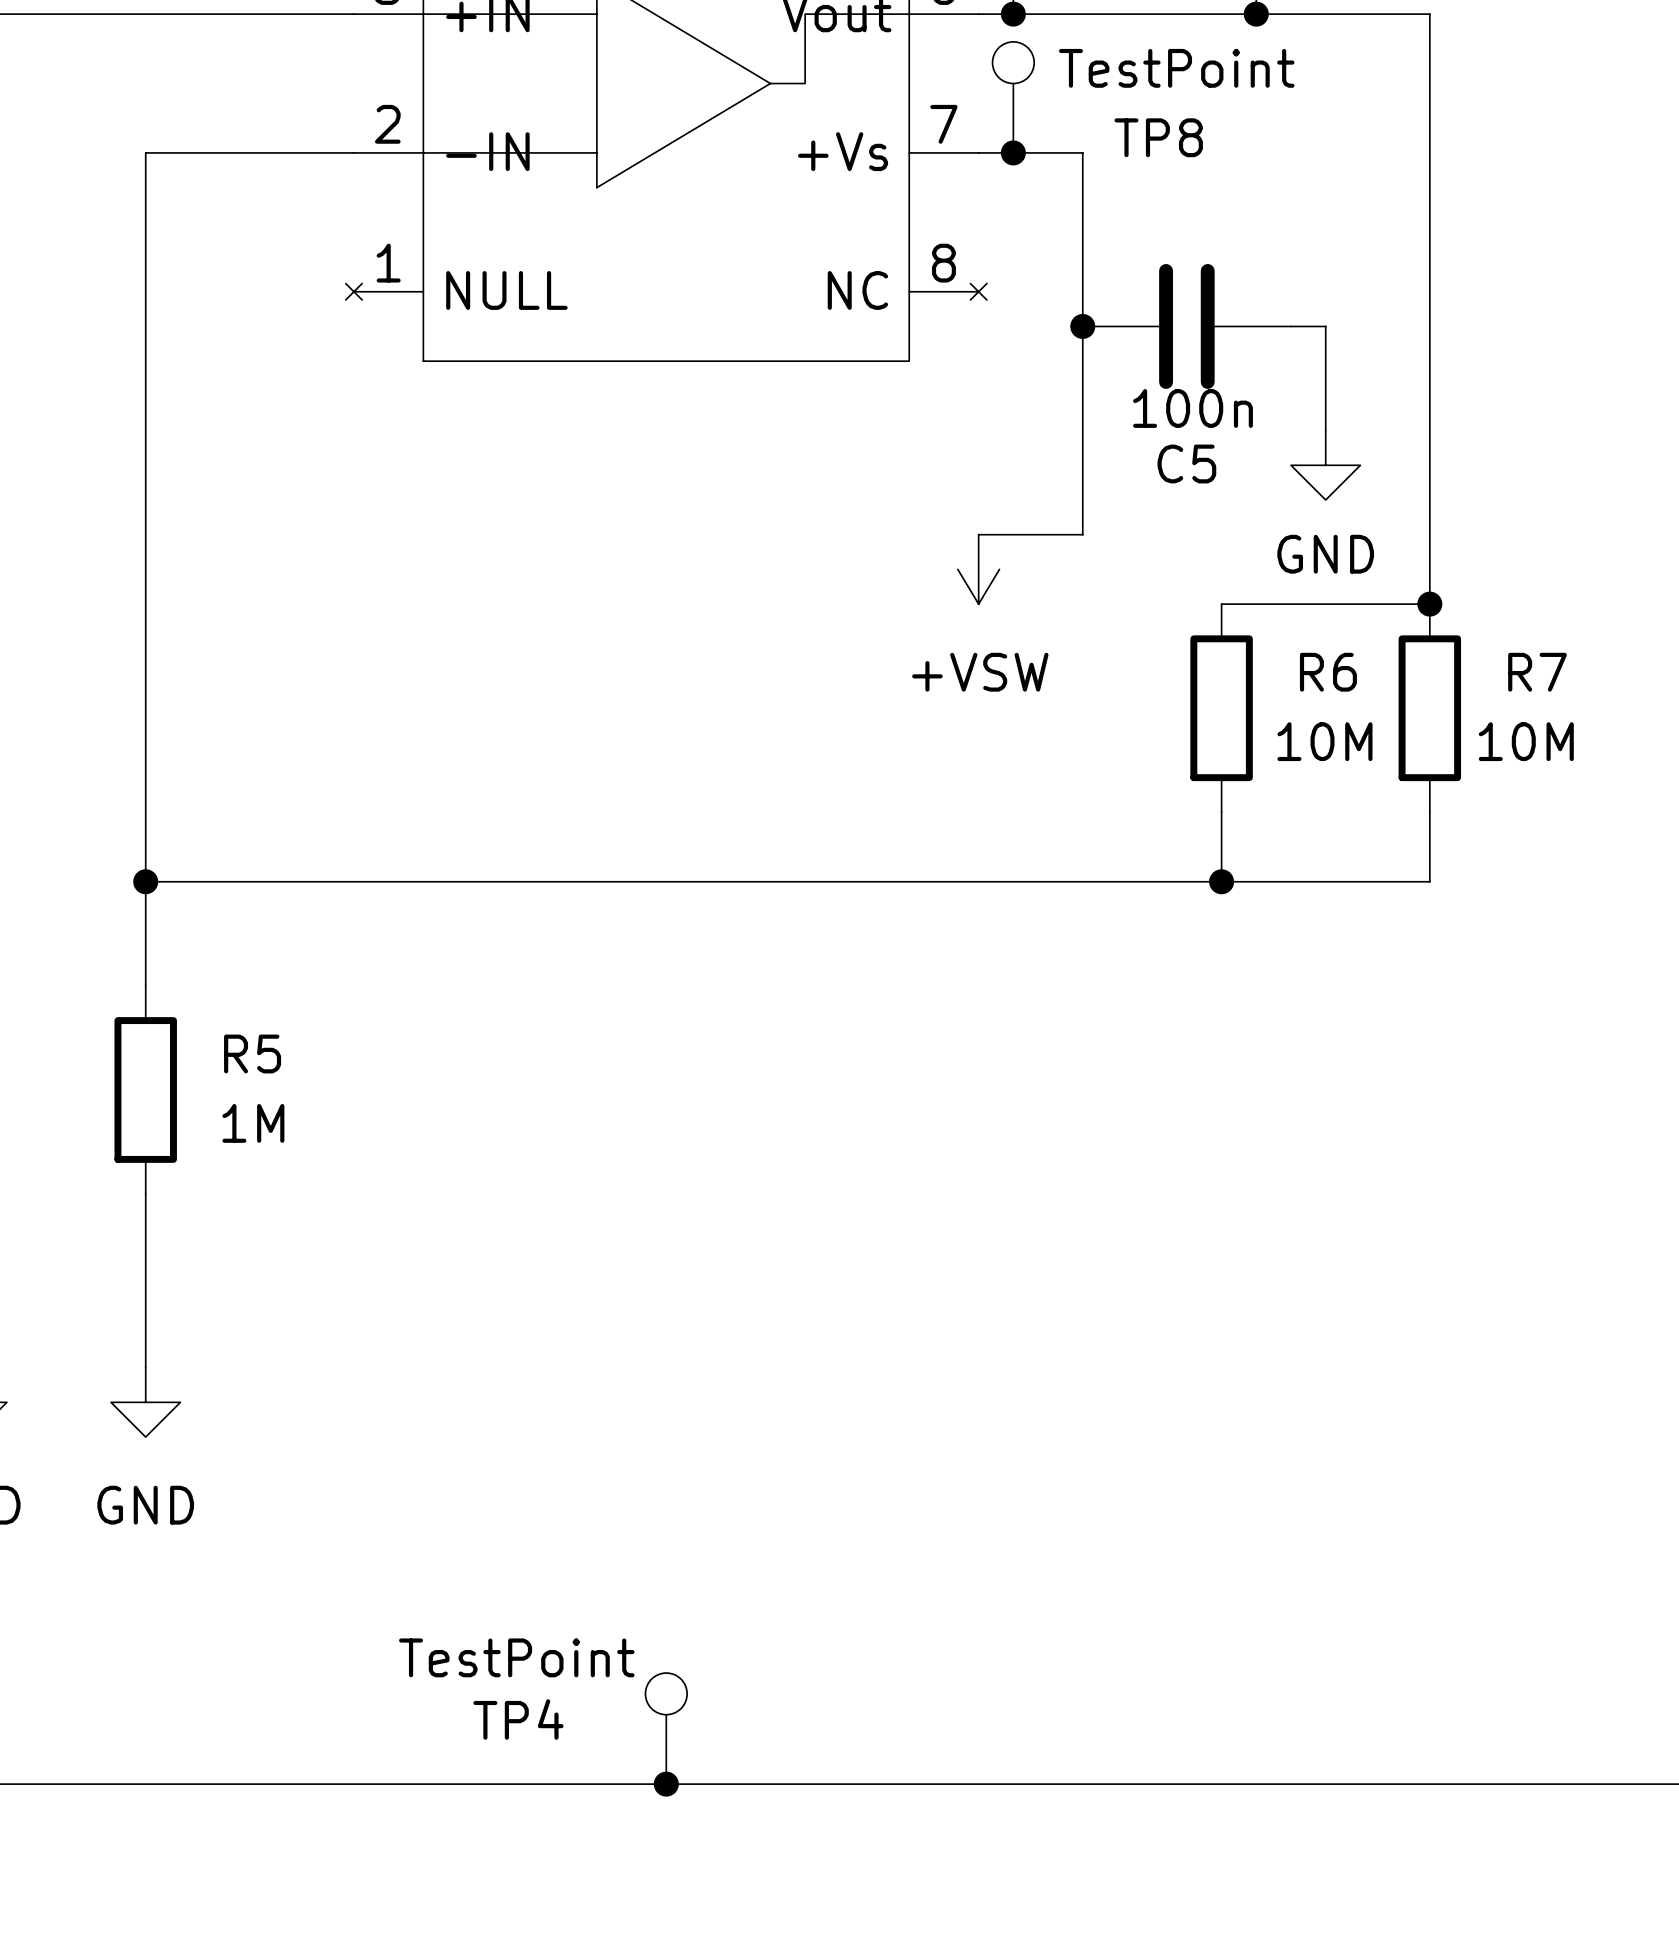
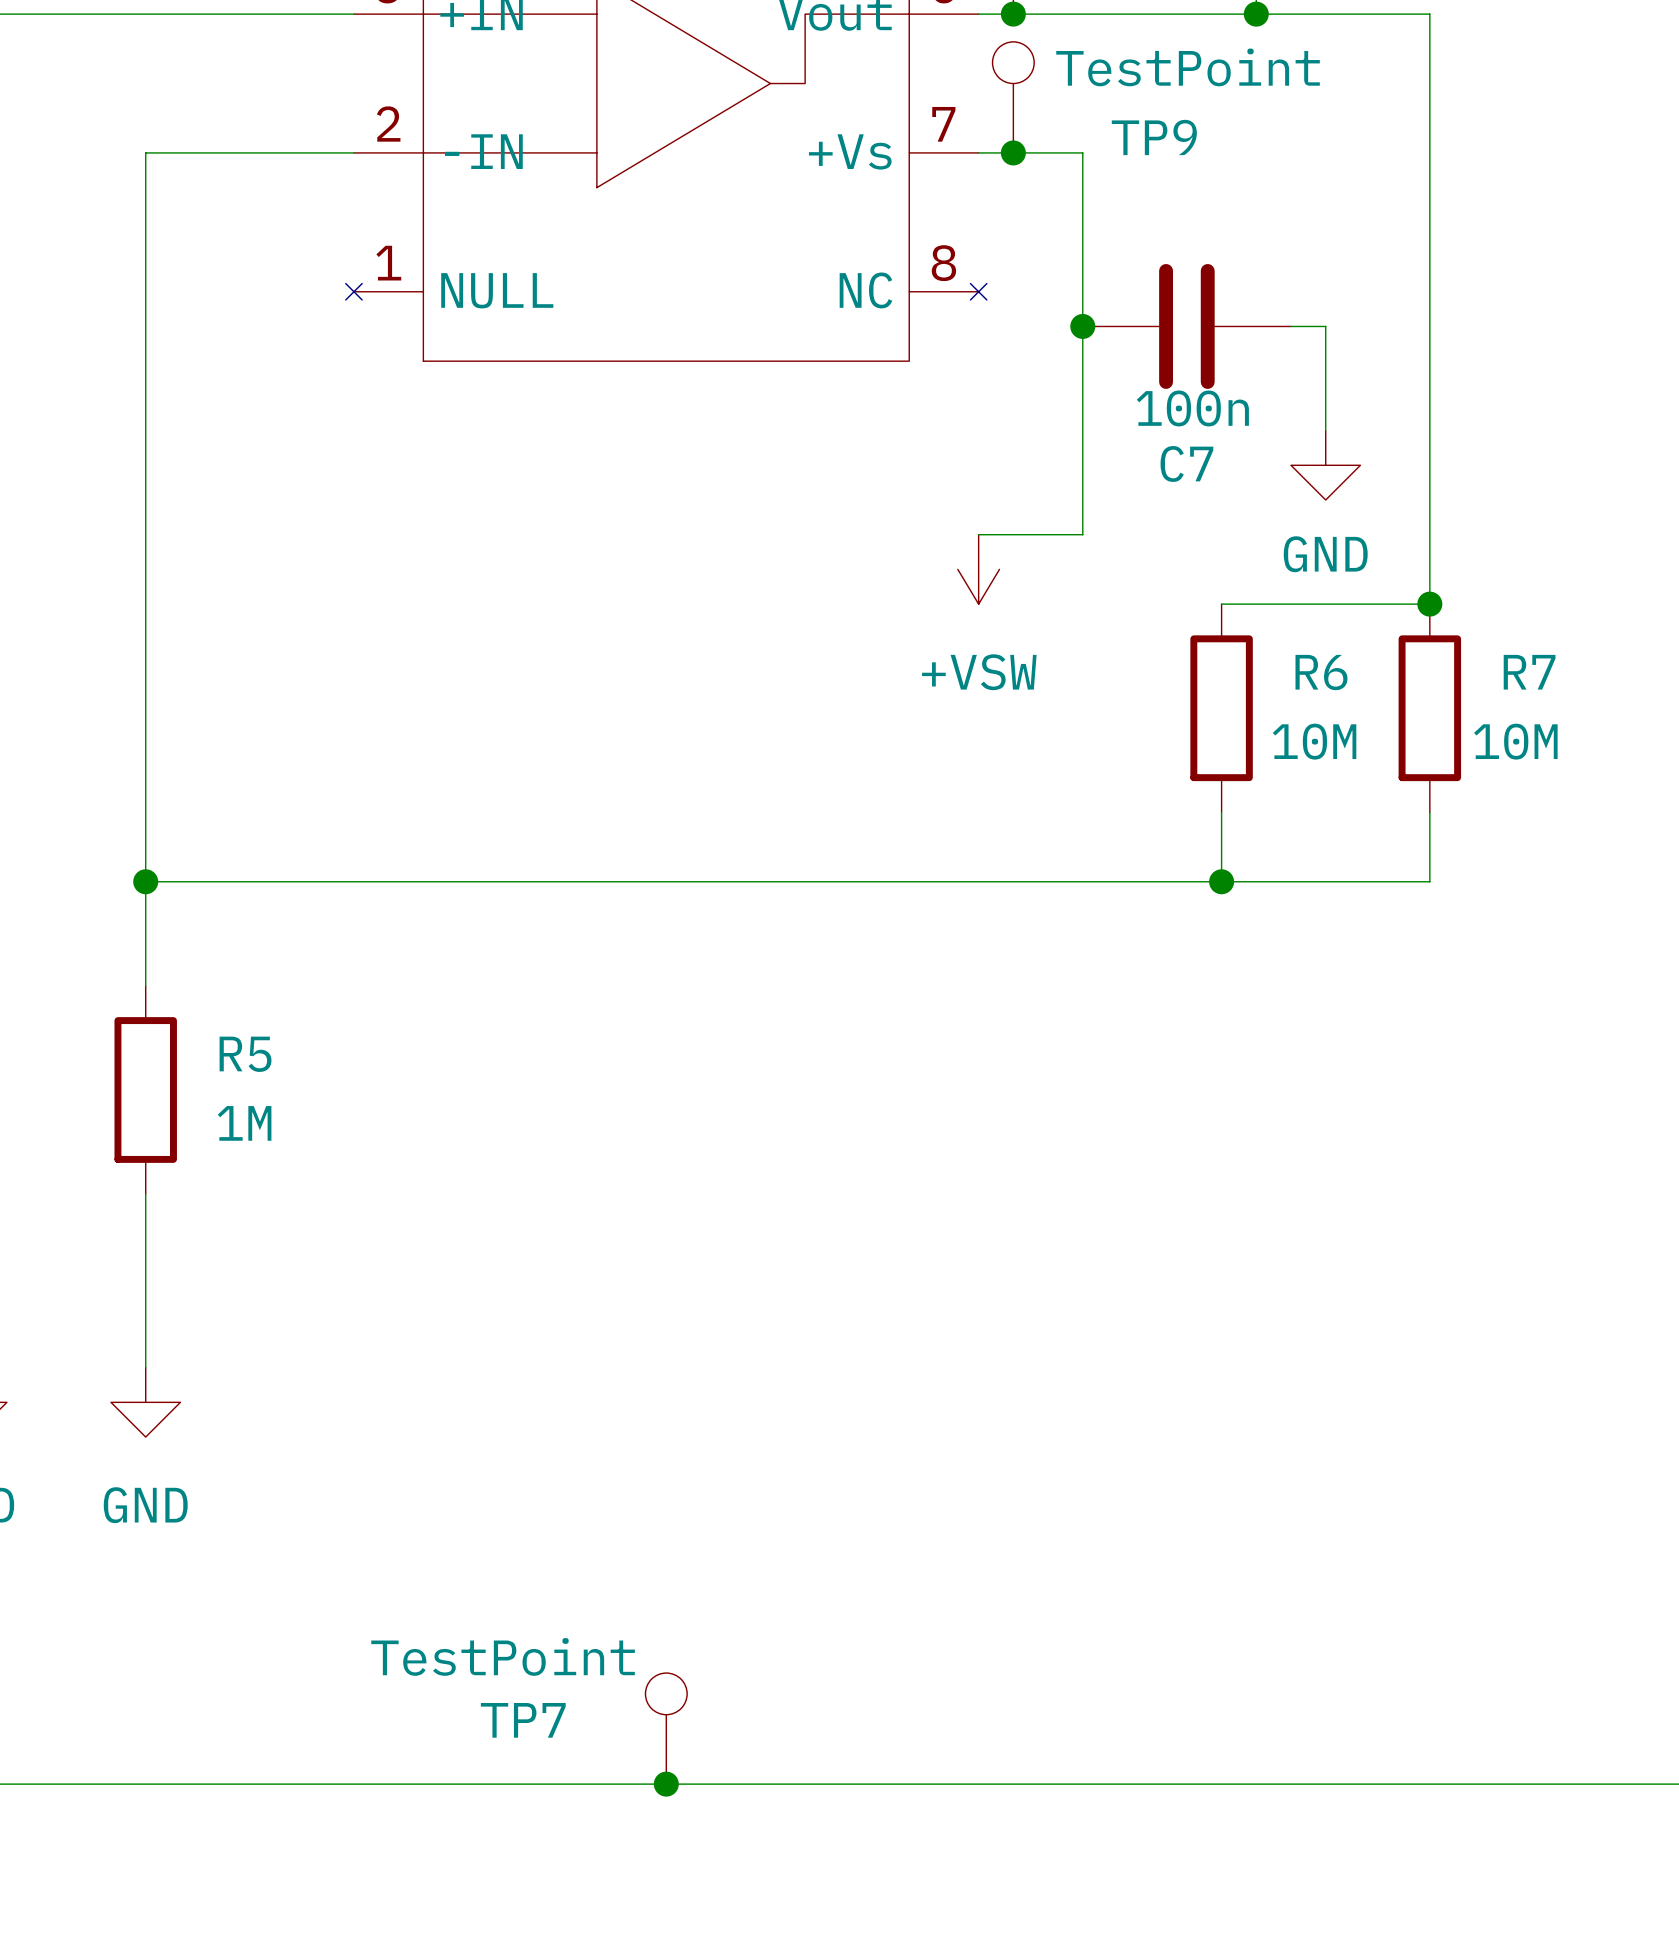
TP8 name: TP8 (1158, 137) -> TP9 (1154, 137)
C5 name: C5 (1186, 463) -> C7 (1186, 463)
TP4 name: TP4 (518, 1719) -> TP7 (523, 1720)

